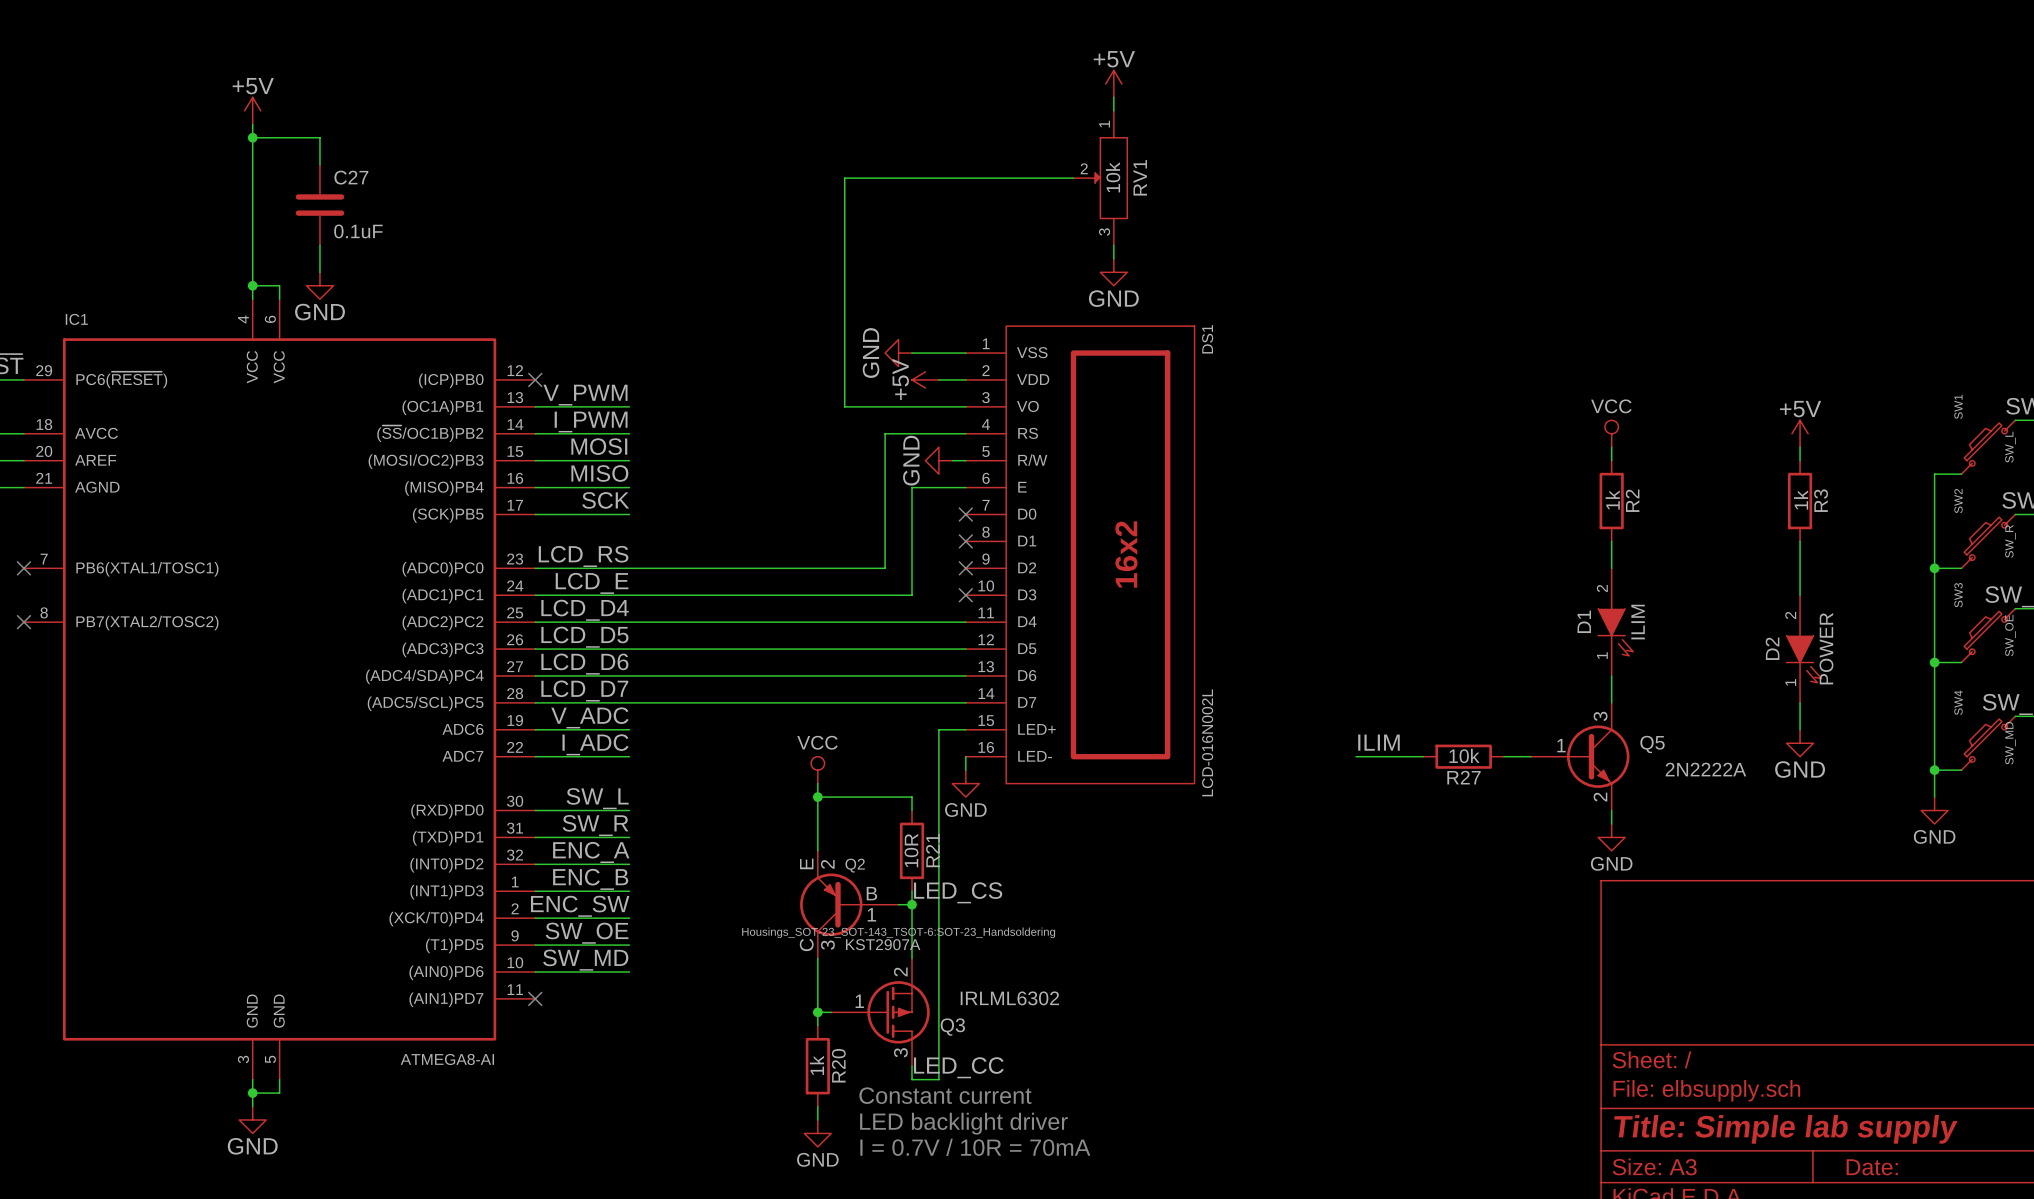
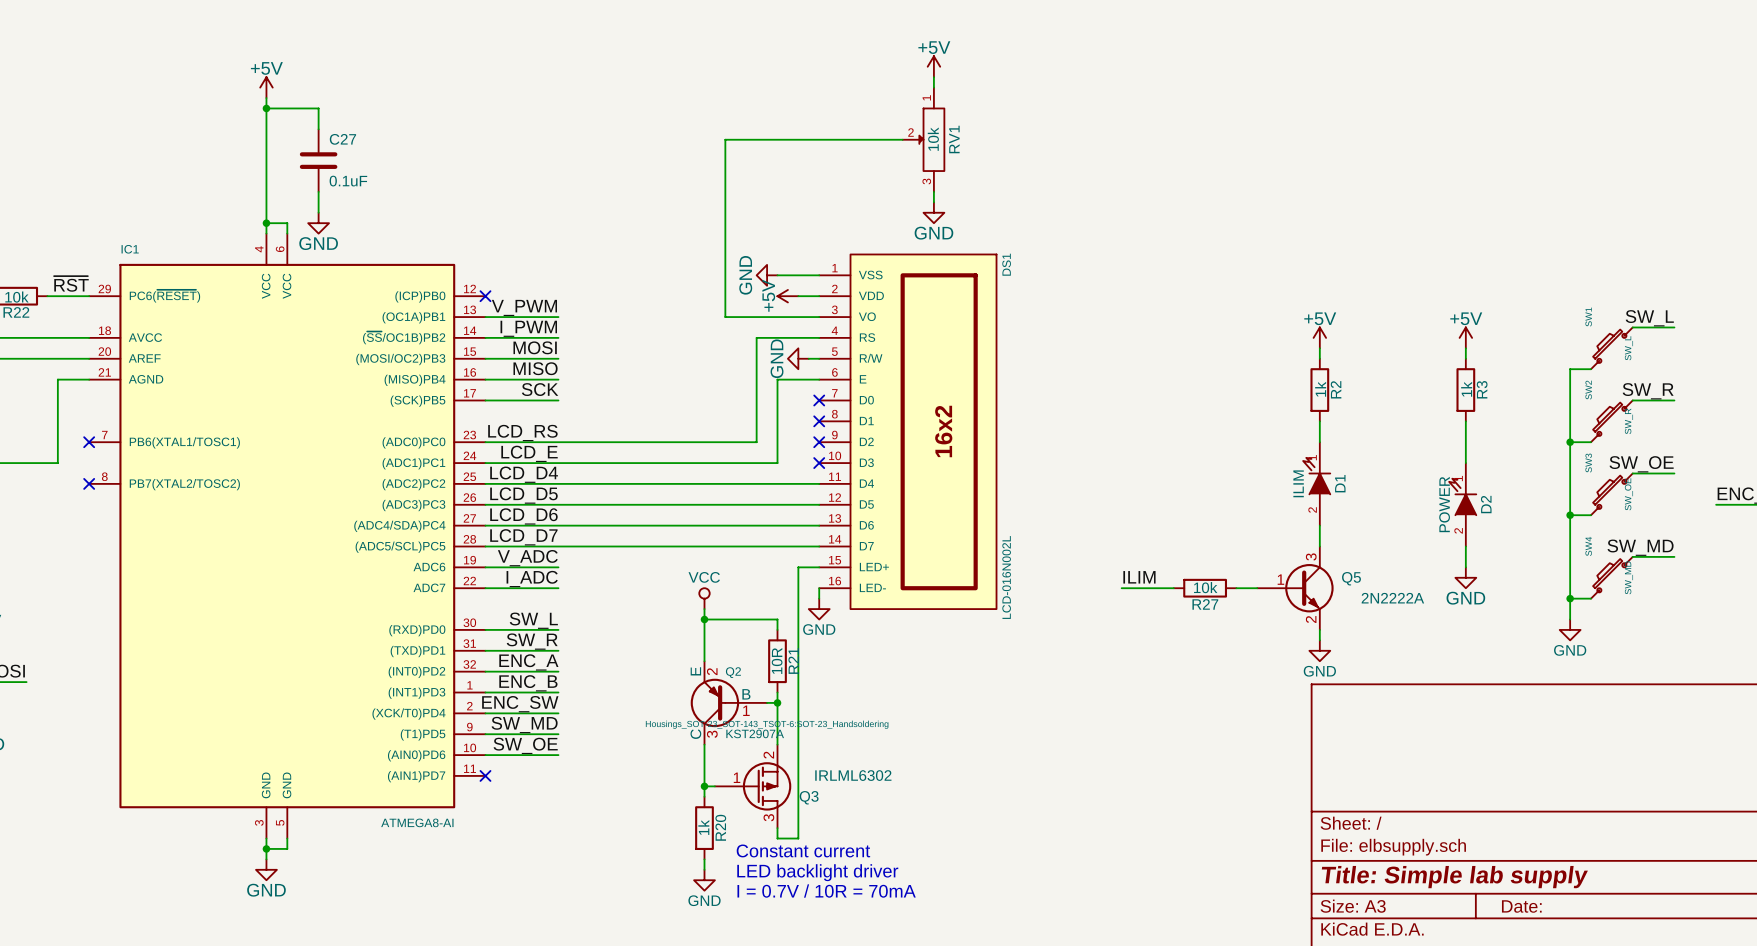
power symbol: VCC (1611, 433) -> +5V (1319, 337)
D1 rotation: 0° (1615, 632) -> 180° (1316, 476)
D2 rotation: 0° (1804, 659) -> 180° (1462, 496)
label: LED_CS (958, 892) -> none
label: SW_OE (587, 933) -> SW_MD (524, 725)
label: SW_MD (585, 960) -> SW_OE (525, 745)
label: LED_CC (958, 1067) -> none

